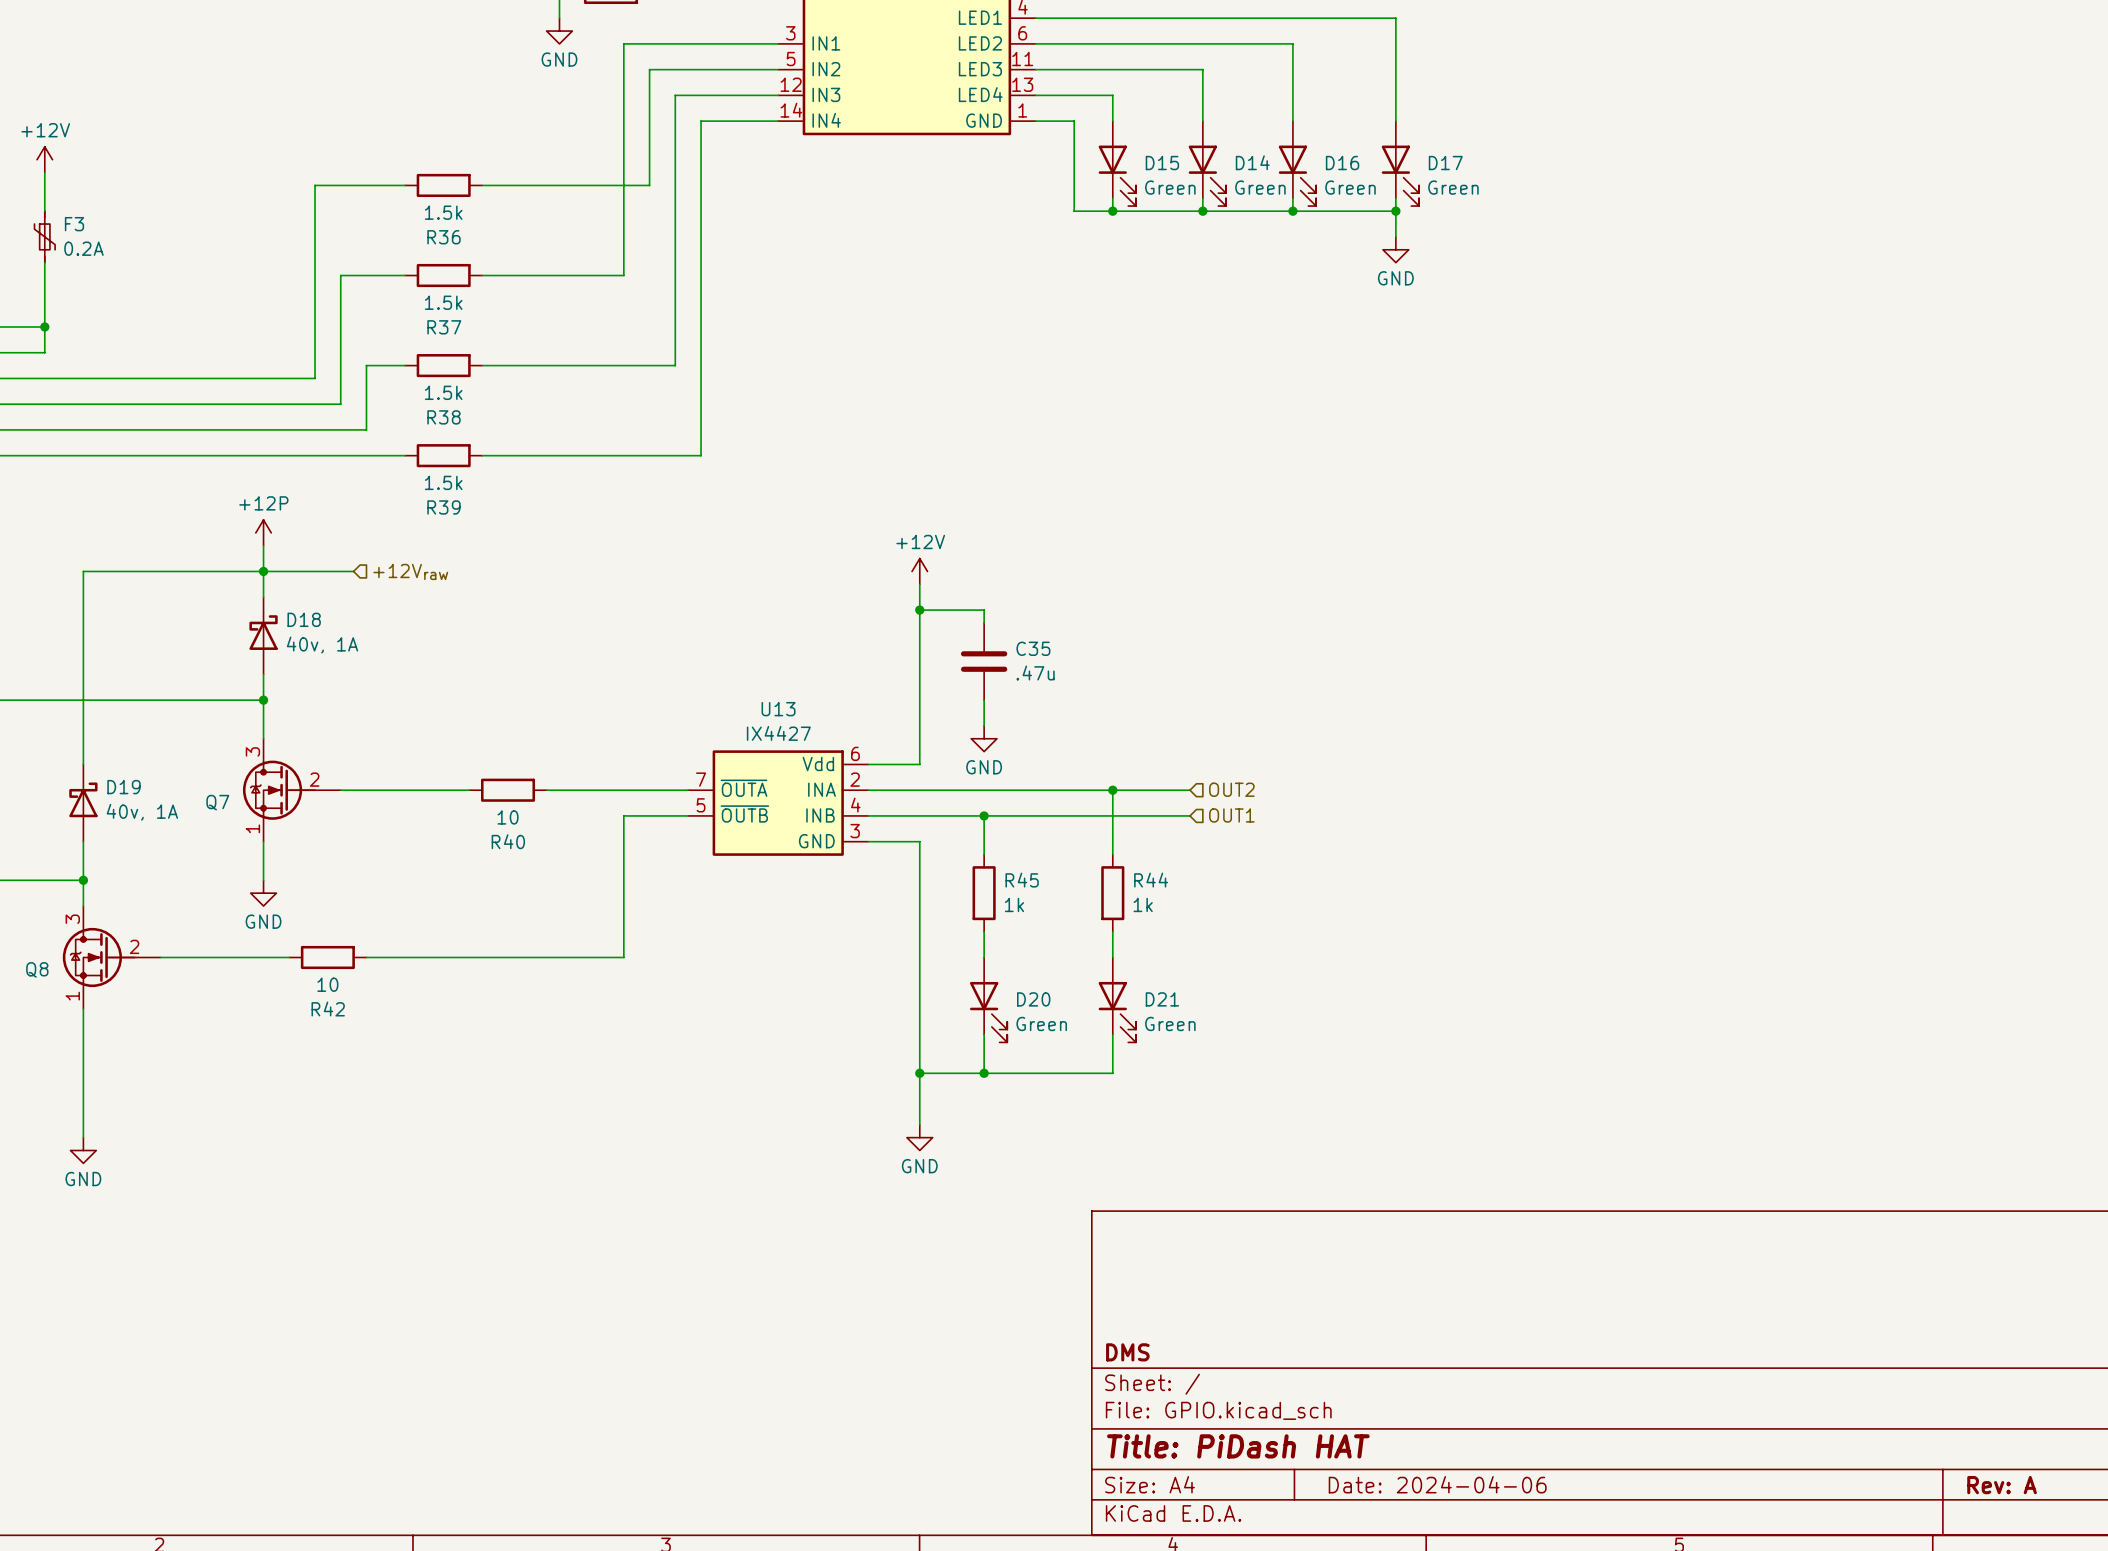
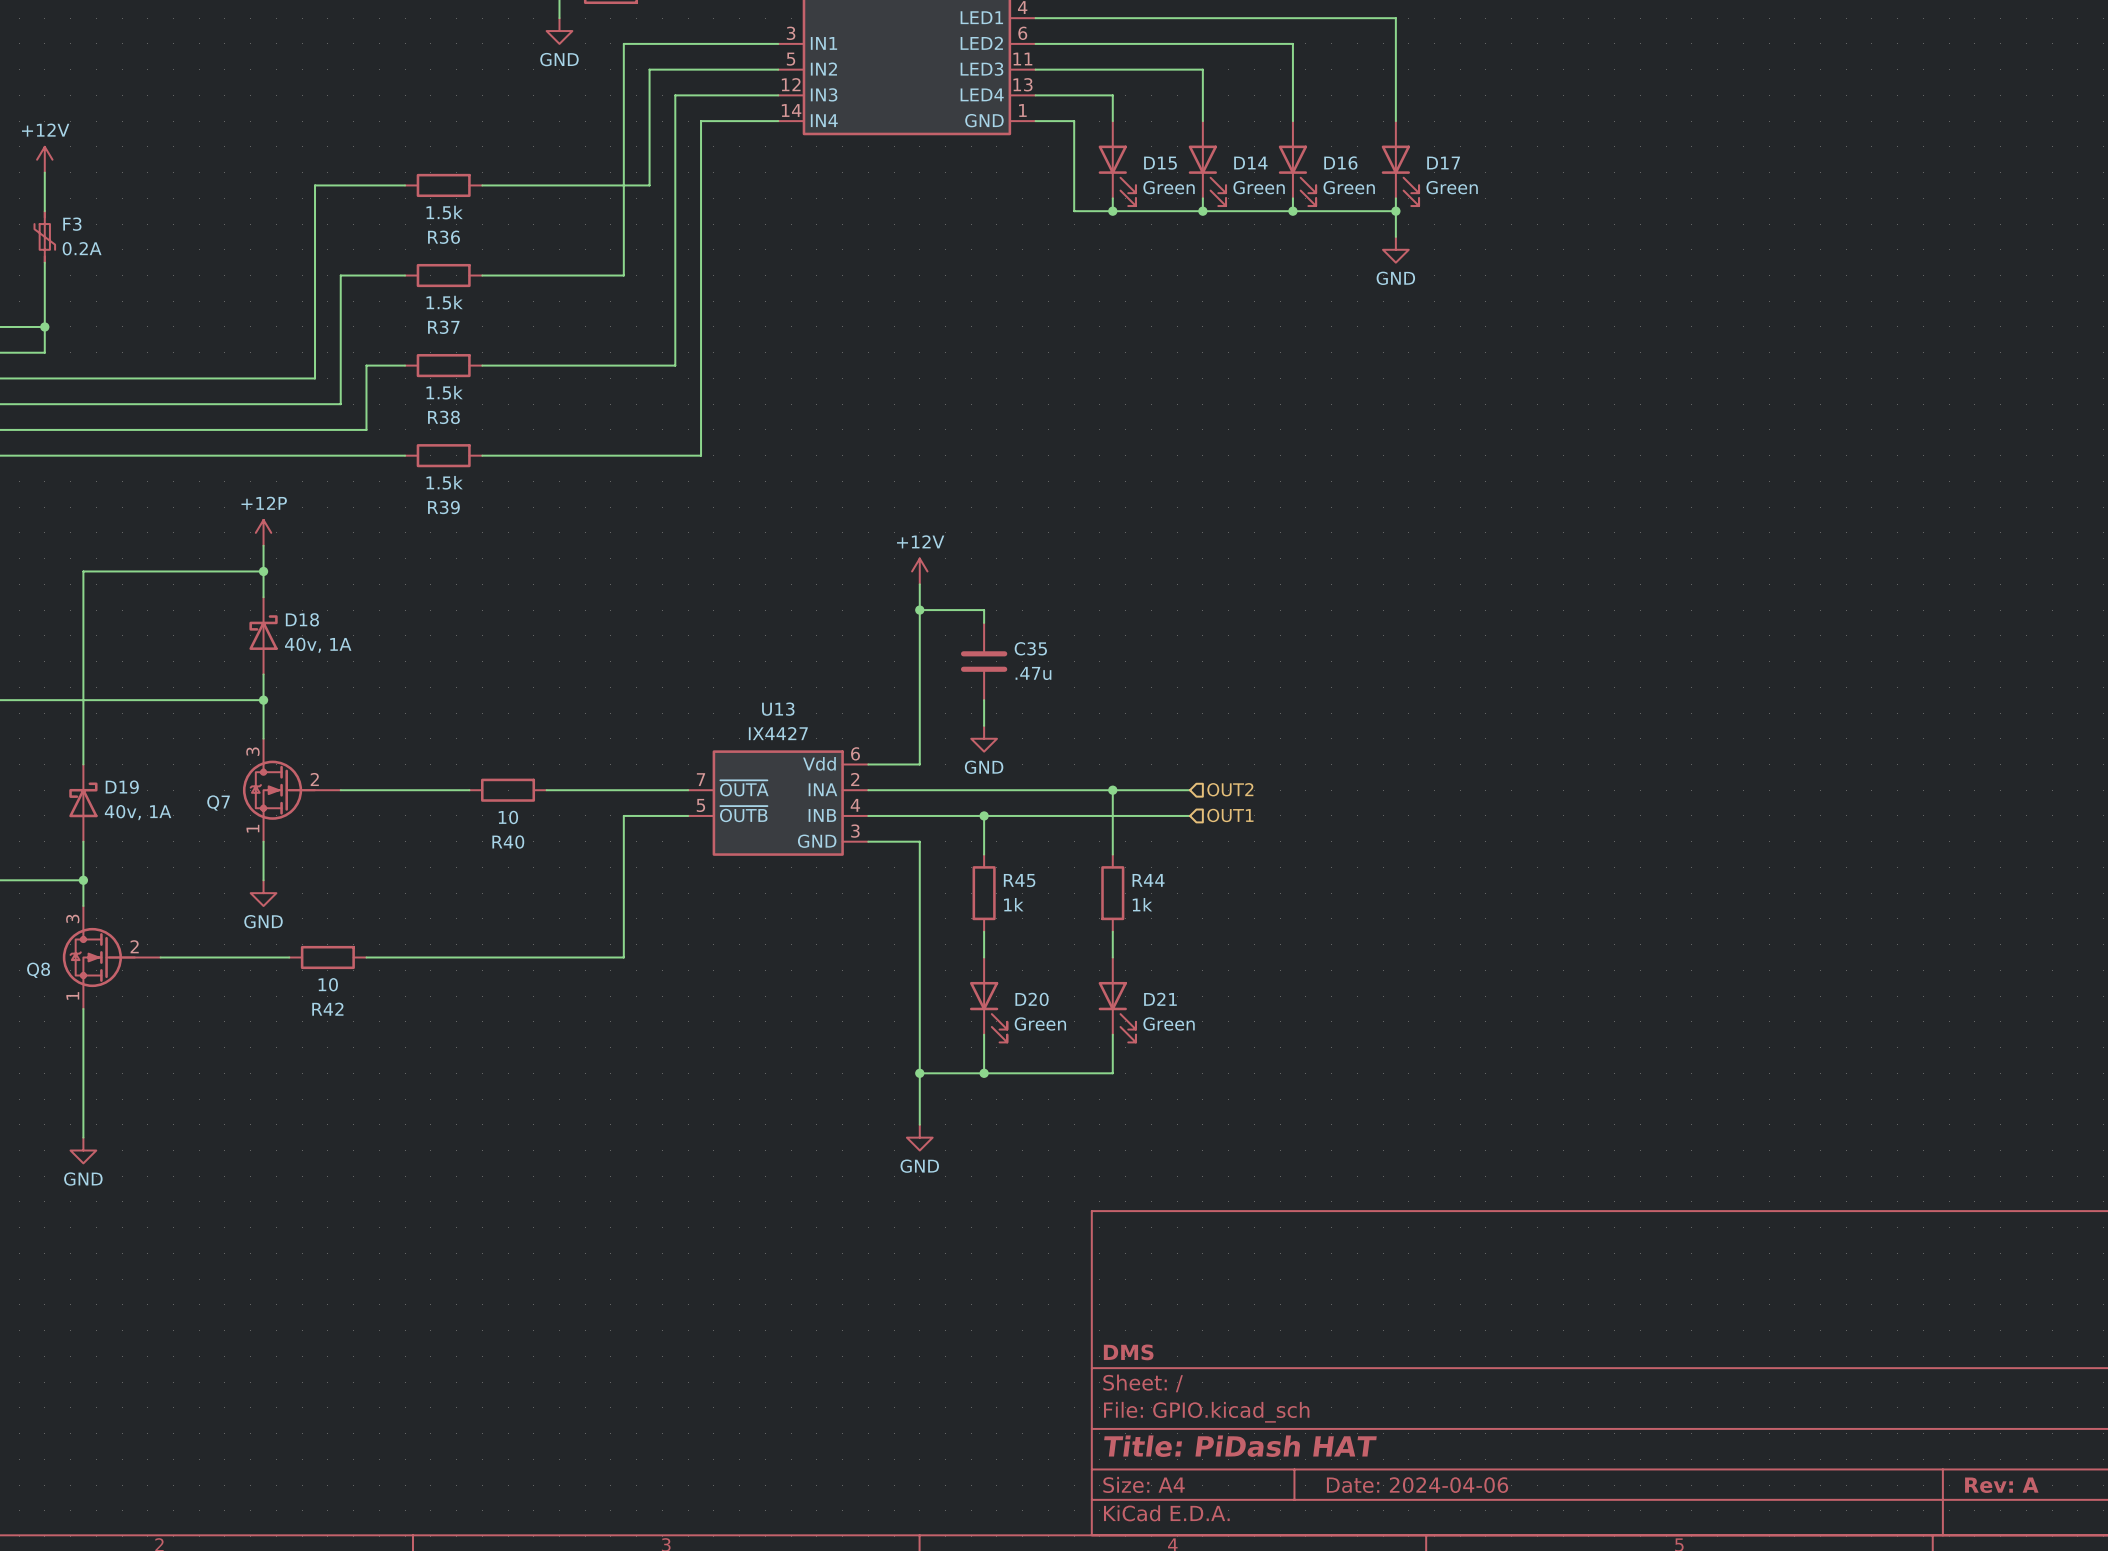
wire: (263, 571) (353, 571) -> none
hierarchical label: +12Vraw (410, 571) -> none

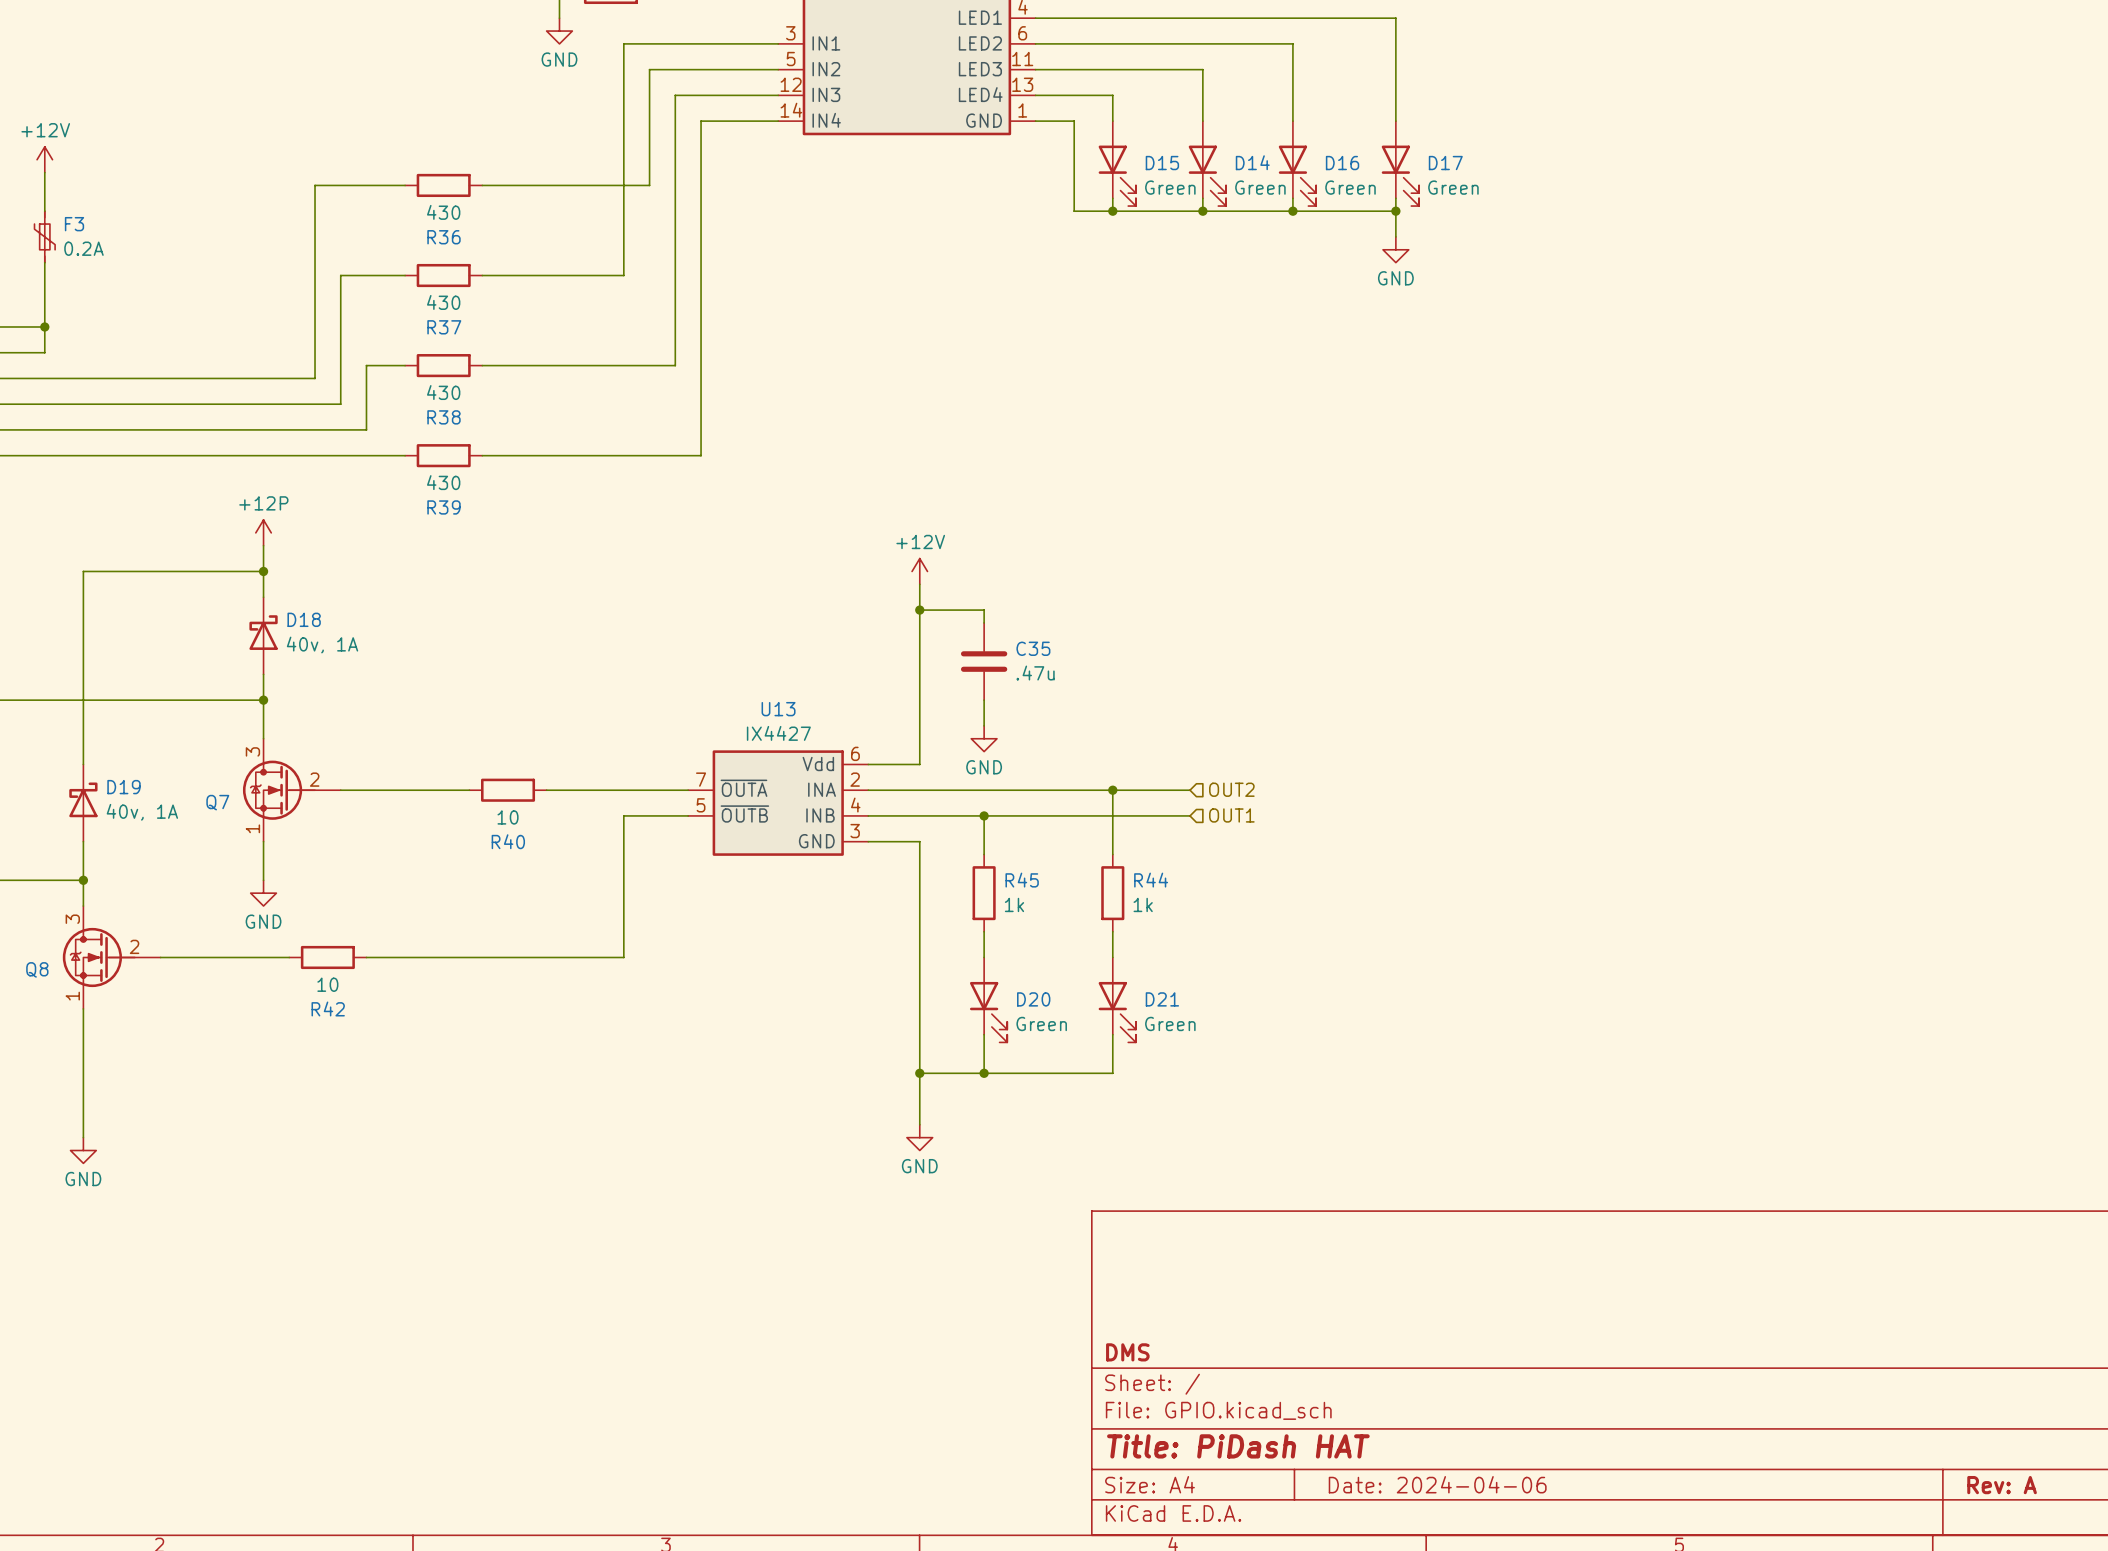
R36 value: 1.5k (444, 212) -> 430 (443, 212)
R37 value: 1.5k (444, 302) -> 430 (443, 302)
R38 value: 1.5k (444, 392) -> 430 (443, 392)
R39 value: 1.5k (444, 482) -> 430 (443, 482)

